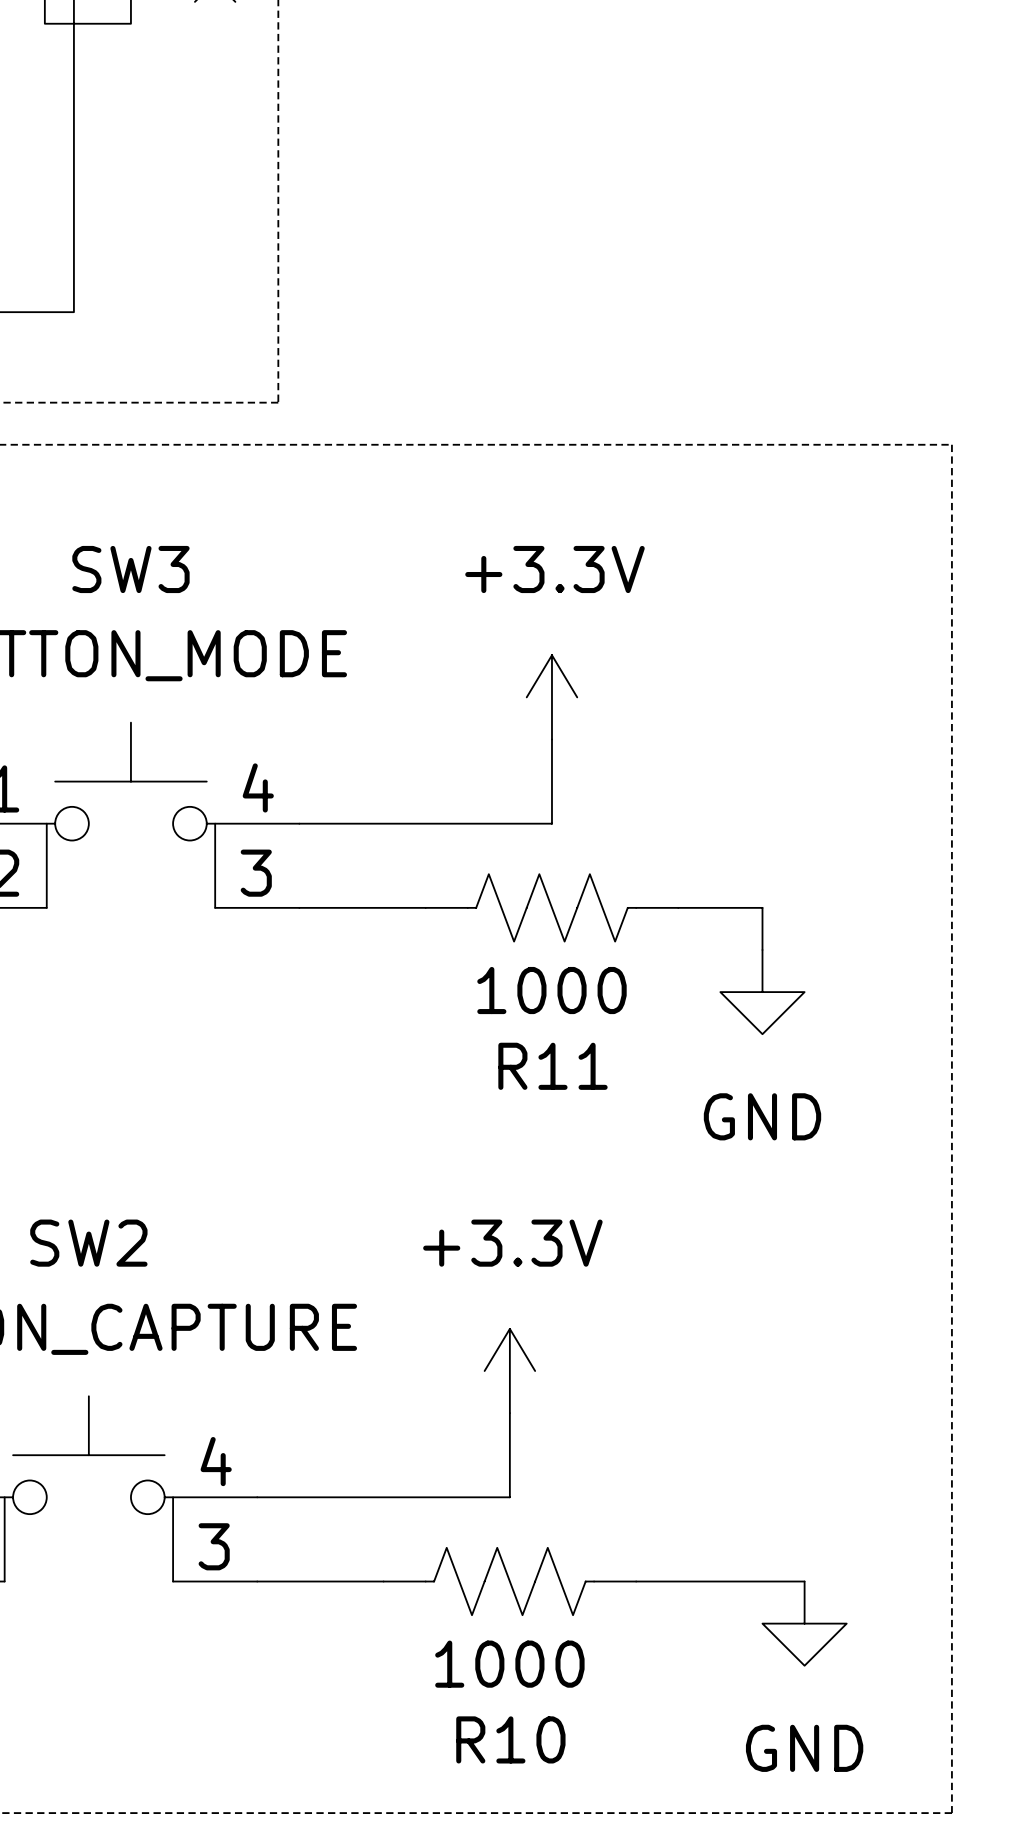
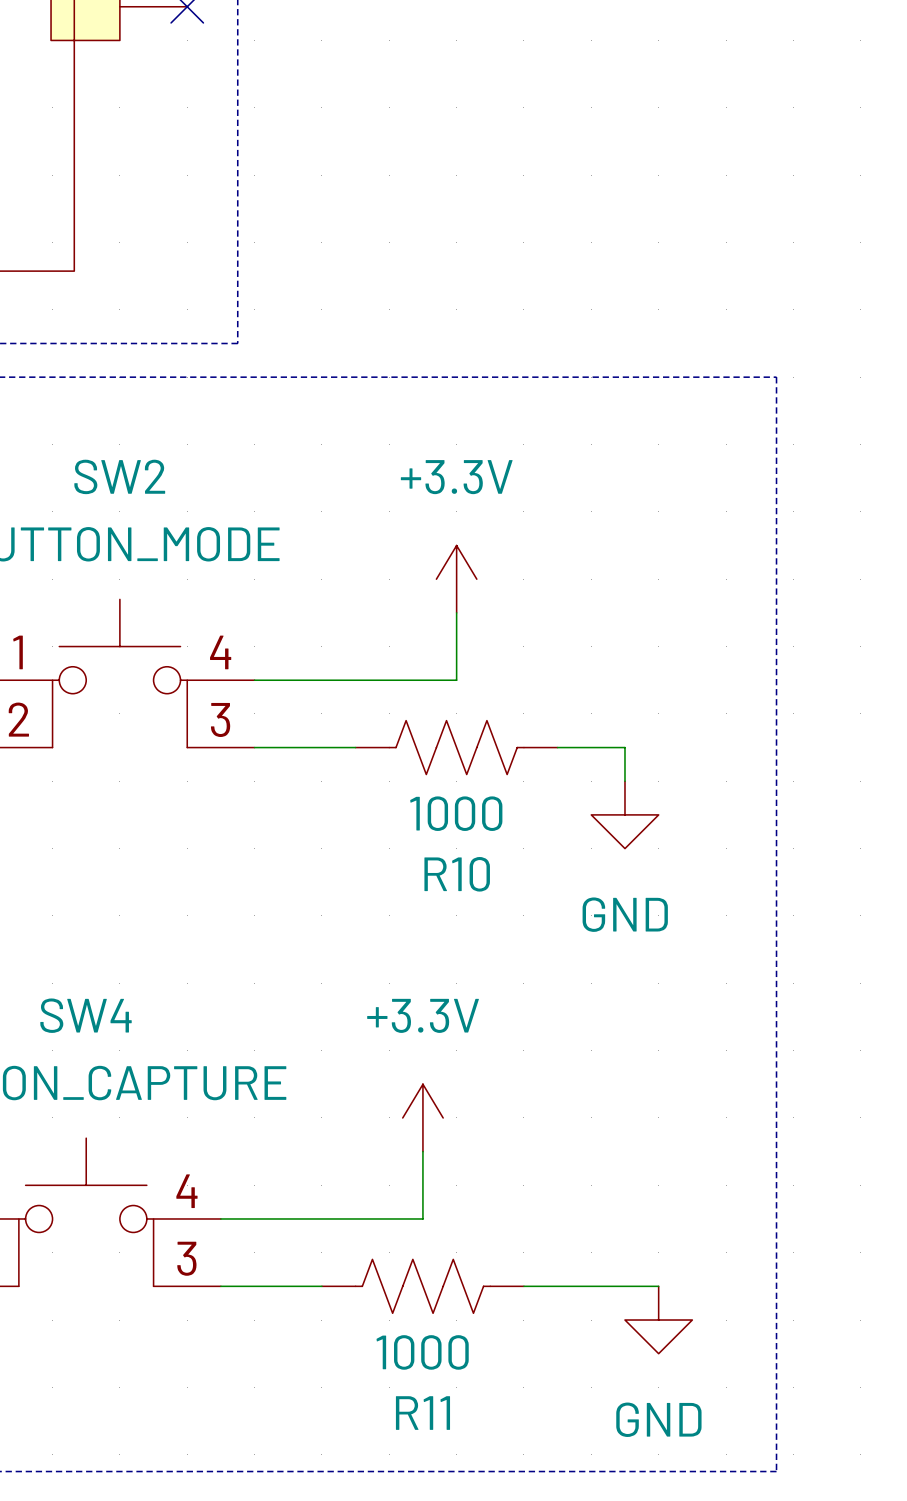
SW3 name: SW3 (130, 569) -> SW2 (119, 476)
R11 name: R11 (552, 1066) -> R10 (457, 874)
SW2 name: SW2 (88, 1243) -> SW4 (86, 1015)
R10 name: R10 (510, 1739) -> R11 (422, 1413)

